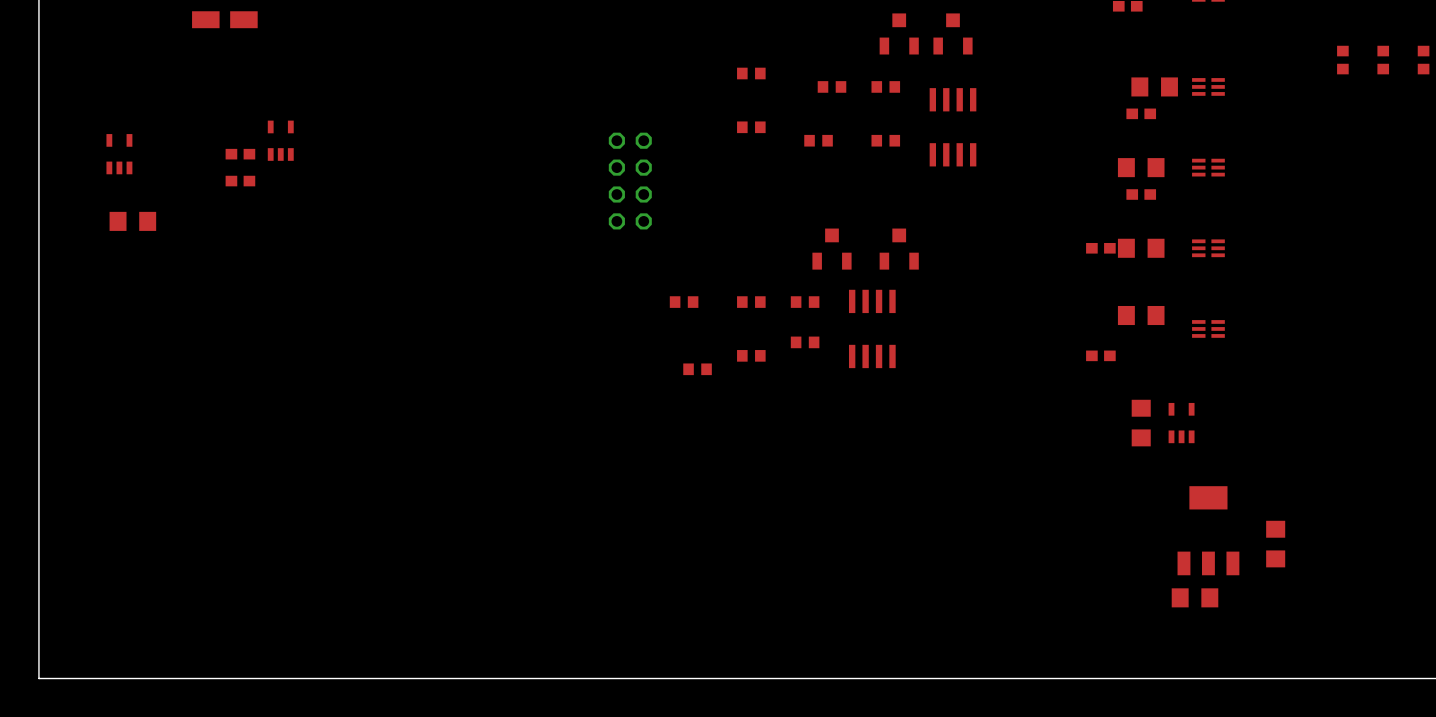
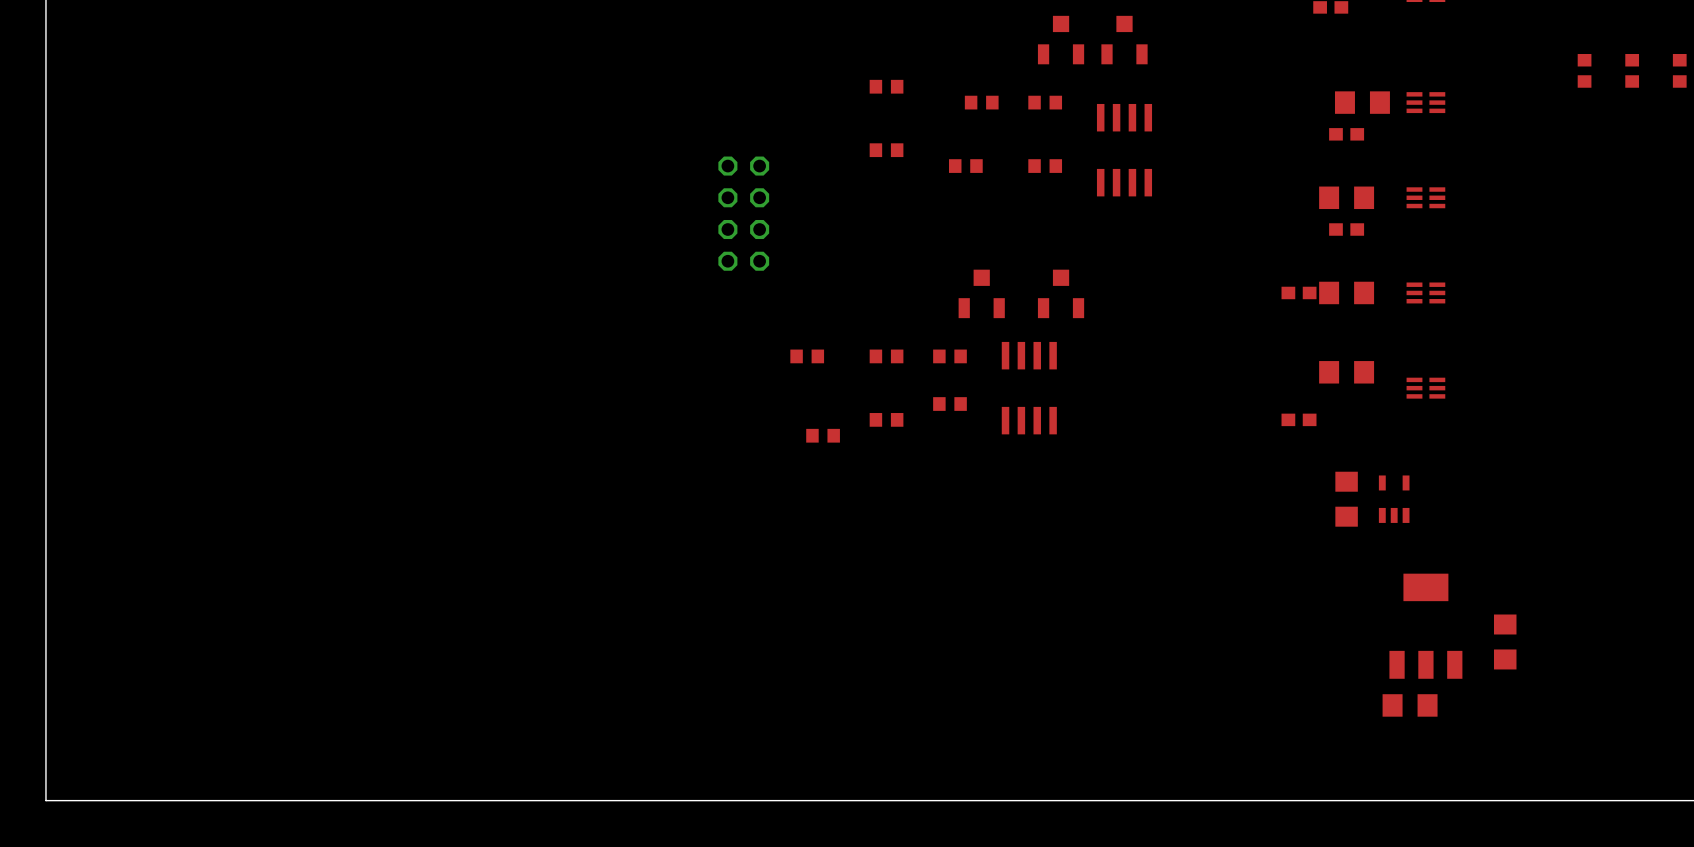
part: (224, 19) -> none
part: (280, 140) -> none
part: (119, 154) -> none
part: (240, 154) -> none
part: (240, 181) -> none
part: (132, 221) -> none

